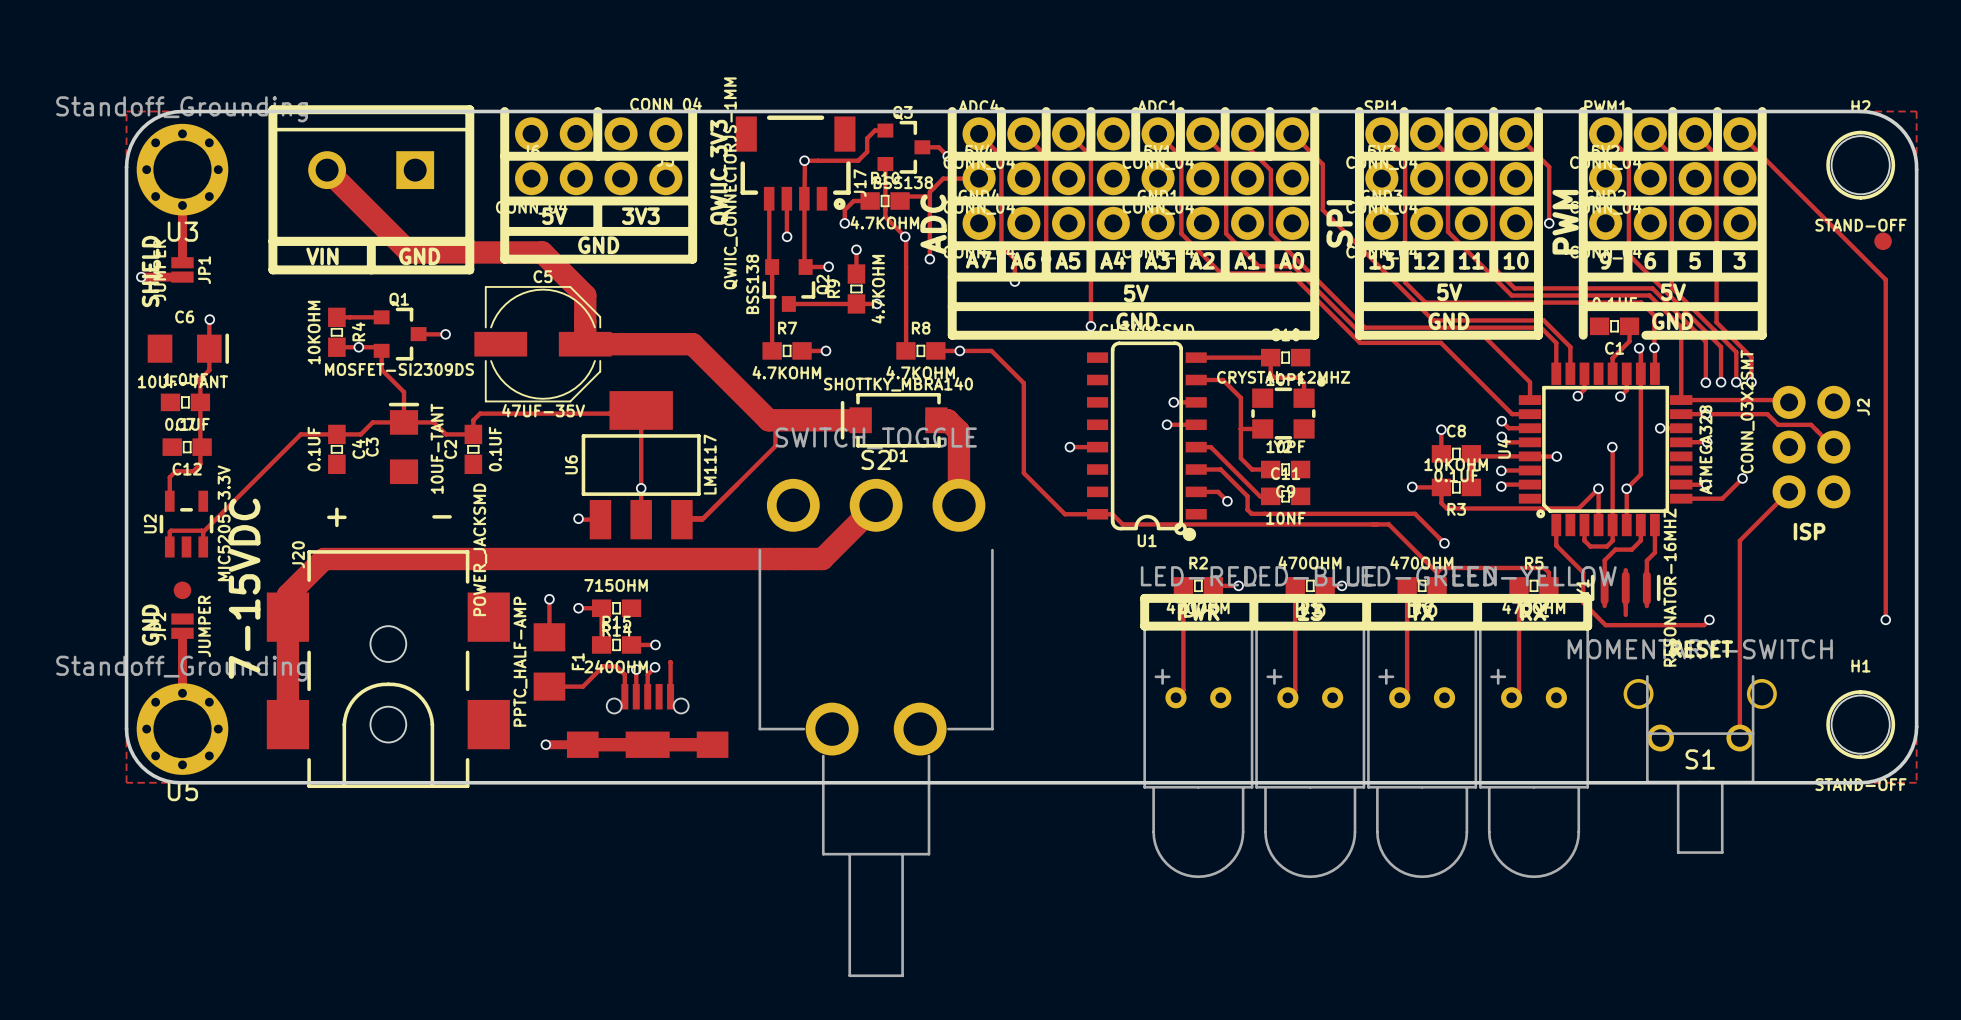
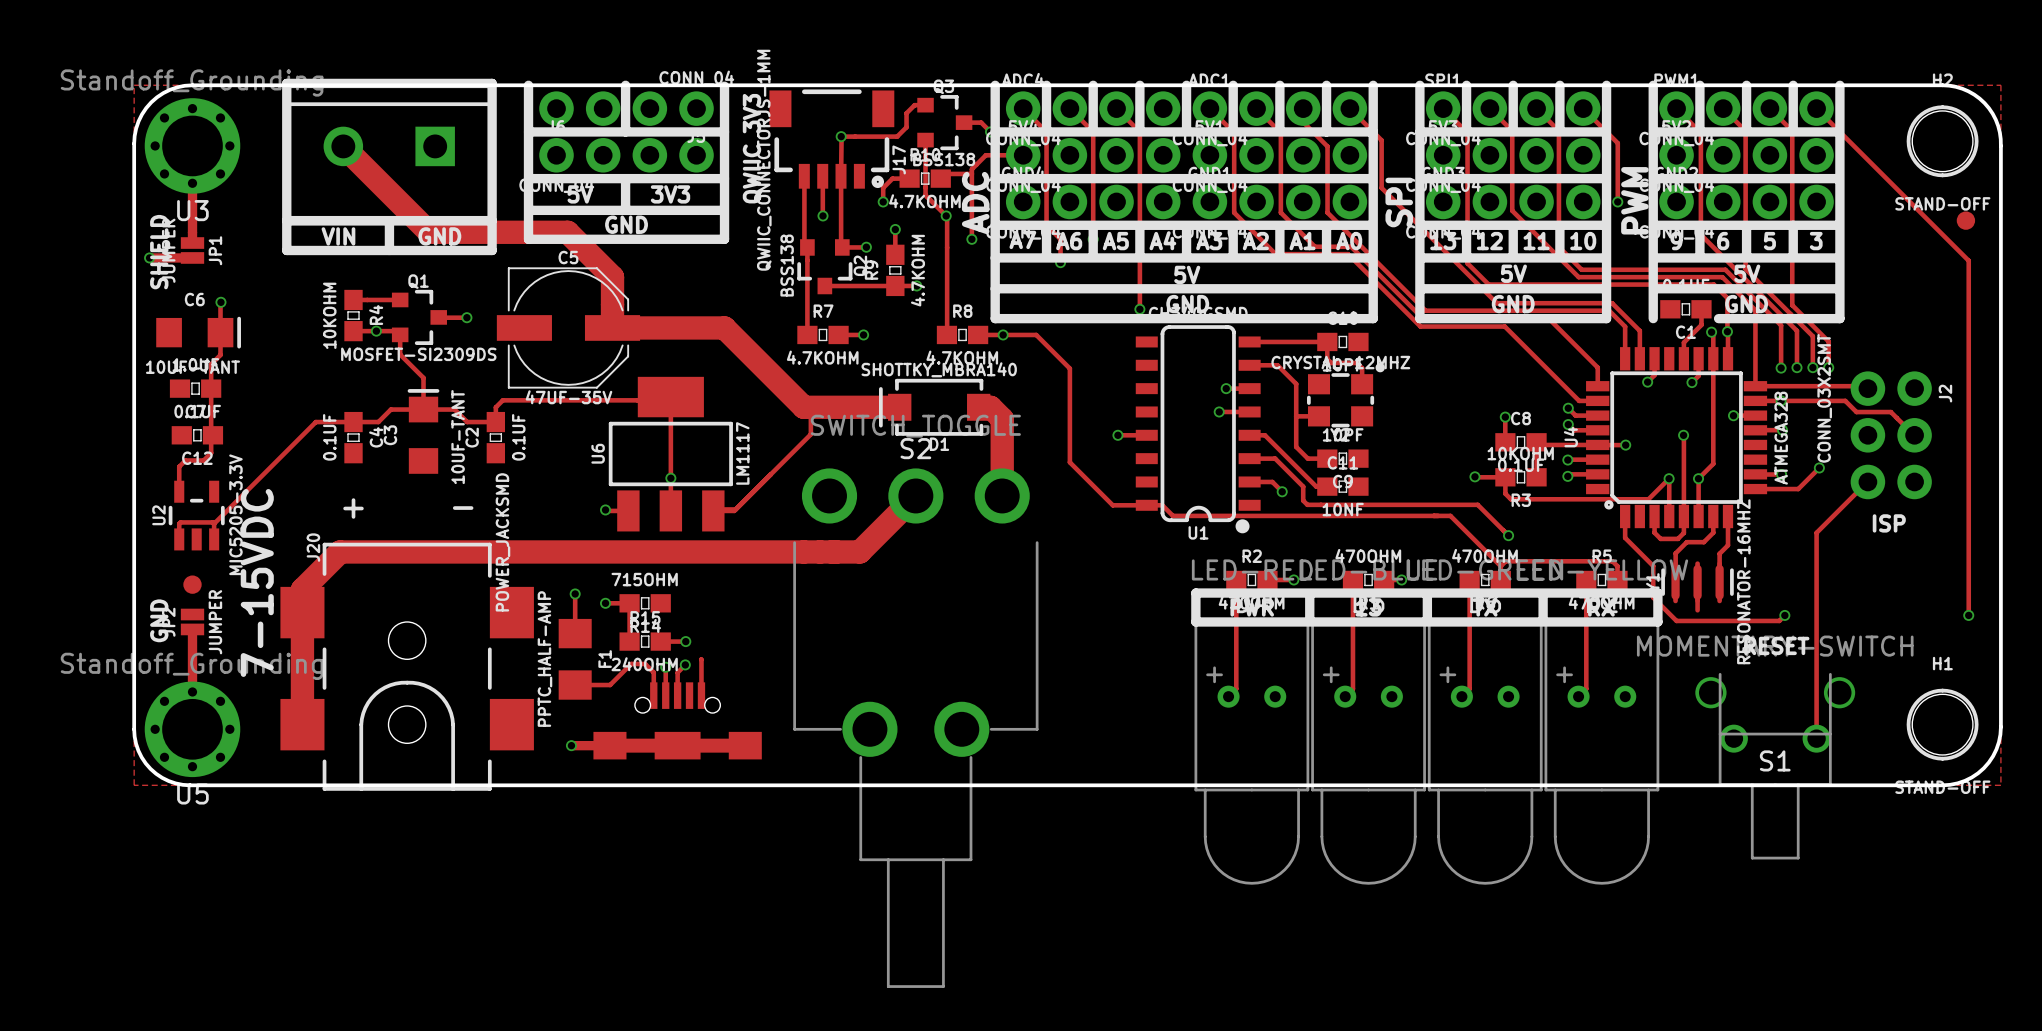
drawing: [1174, 522, 1187, 536] -> none

